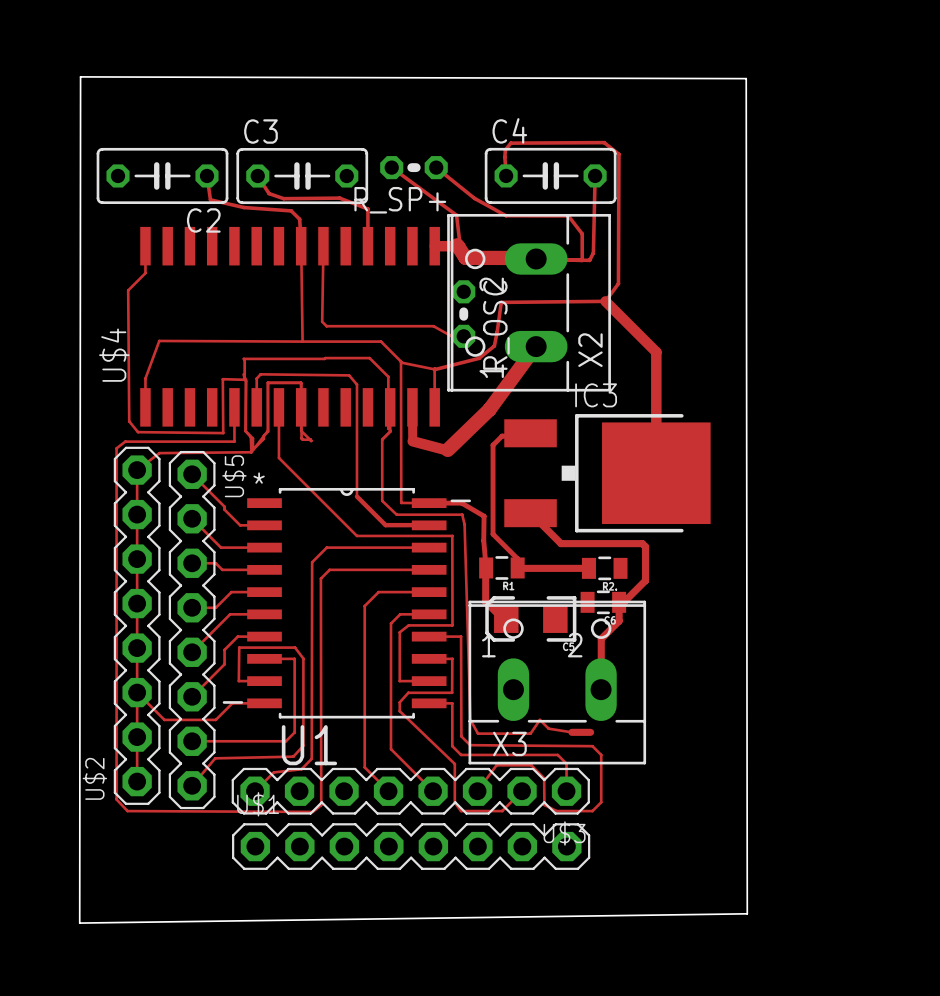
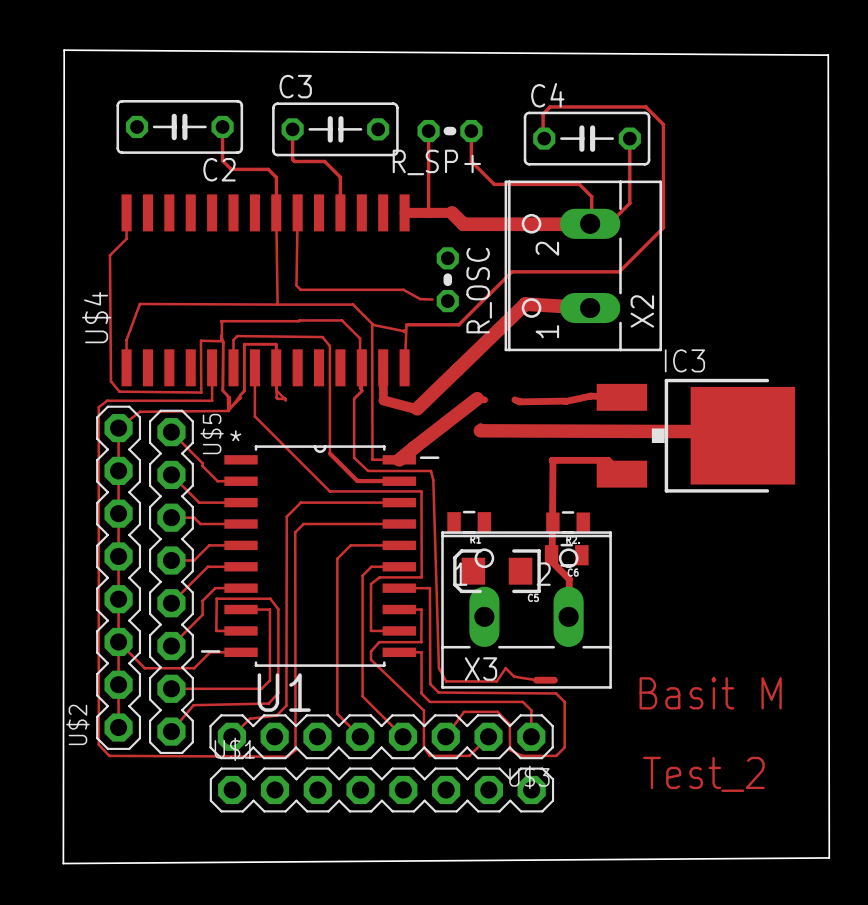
board edge: (80, 76) (746, 78) (747, 913) (79, 923) -> (64, 50) (828, 55) (829, 857) (63, 863)
track: none -> (428, 131) (429, 212) (452, 212) (463, 224) (589, 224)
track: none -> (471, 131) (471, 161) (494, 184) (579, 184) (591, 196) (590, 223)
track: (391, 167) (456, 215) (460, 246) (457, 245) (465, 257) (537, 258) -> none
R_SP+ position: (413, 167) -> (450, 131)
track: (436, 167) (474, 198) (506, 215) (568, 215) (582, 233) (582, 260) (536, 259) (589, 260) (593, 253) (595, 175) -> none
track: none -> (544, 138) (543, 114) (550, 106) (645, 106) (663, 124) (663, 227) (619, 271) (512, 271) (488, 294)
track: none -> (629, 138) (629, 203) (610, 222) (591, 222)
C2 position: (162, 175) -> (179, 126)
track: (207, 175) (210, 199) (243, 207) (291, 210) (299, 219) (301, 246) -> (222, 126) (222, 160) (231, 169) (268, 169) (276, 177) (276, 212)
track: (506, 175) (505, 150) (510, 143) (604, 142) (618, 154) (618, 283) (605, 301) -> none
C4 position: (550, 175) -> (587, 138)
track: (257, 176) (269, 193) (283, 198) (339, 198) (367, 209) -> (292, 129) (292, 159) (294, 161) (324, 161) (340, 177)
C3 position: (302, 176) -> (335, 129)
track: (605, 301) (501, 302) (494, 346) (479, 358) (434, 369) (434, 407) -> (488, 294) (458, 324) (406, 324) (404, 367)
track: (605, 301) (656, 352) (656, 473) -> none
X2 position: (529, 302) -> (583, 265)
R_OSC position: (463, 314) -> (447, 279)
track: (536, 346) (489, 409) -> (590, 308) (525, 304) (457, 369)
track: (530, 433) (527, 436) (502, 436) (493, 445) (493, 534) (517, 558) (518, 568) (588, 568) -> none
track: none -> (621, 397) (590, 396) (565, 401) (519, 401) (514, 399)
track: none -> (480, 426) (480, 430) (695, 431) (682, 431) (742, 435)
IC3 position: (607, 473) -> (695, 435)
track: (429, 503) (461, 503) (484, 516) (485, 601) (502, 618) (506, 618) -> (399, 459) (477, 398) (484, 399)
track: none -> (552, 460) (608, 460) (621, 474)
track: none -> (553, 460) (552, 562) (569, 579) (568, 616)
track: (530, 513) (560, 543) (642, 543) (645, 546) (645, 580) (625, 600) (617, 600) (619, 621) (601, 638) (601, 689) -> none
X3 position: (557, 682) -> (526, 610)
text: none -> Basit M (710, 693)
text: none -> Test_2 (703, 774)

